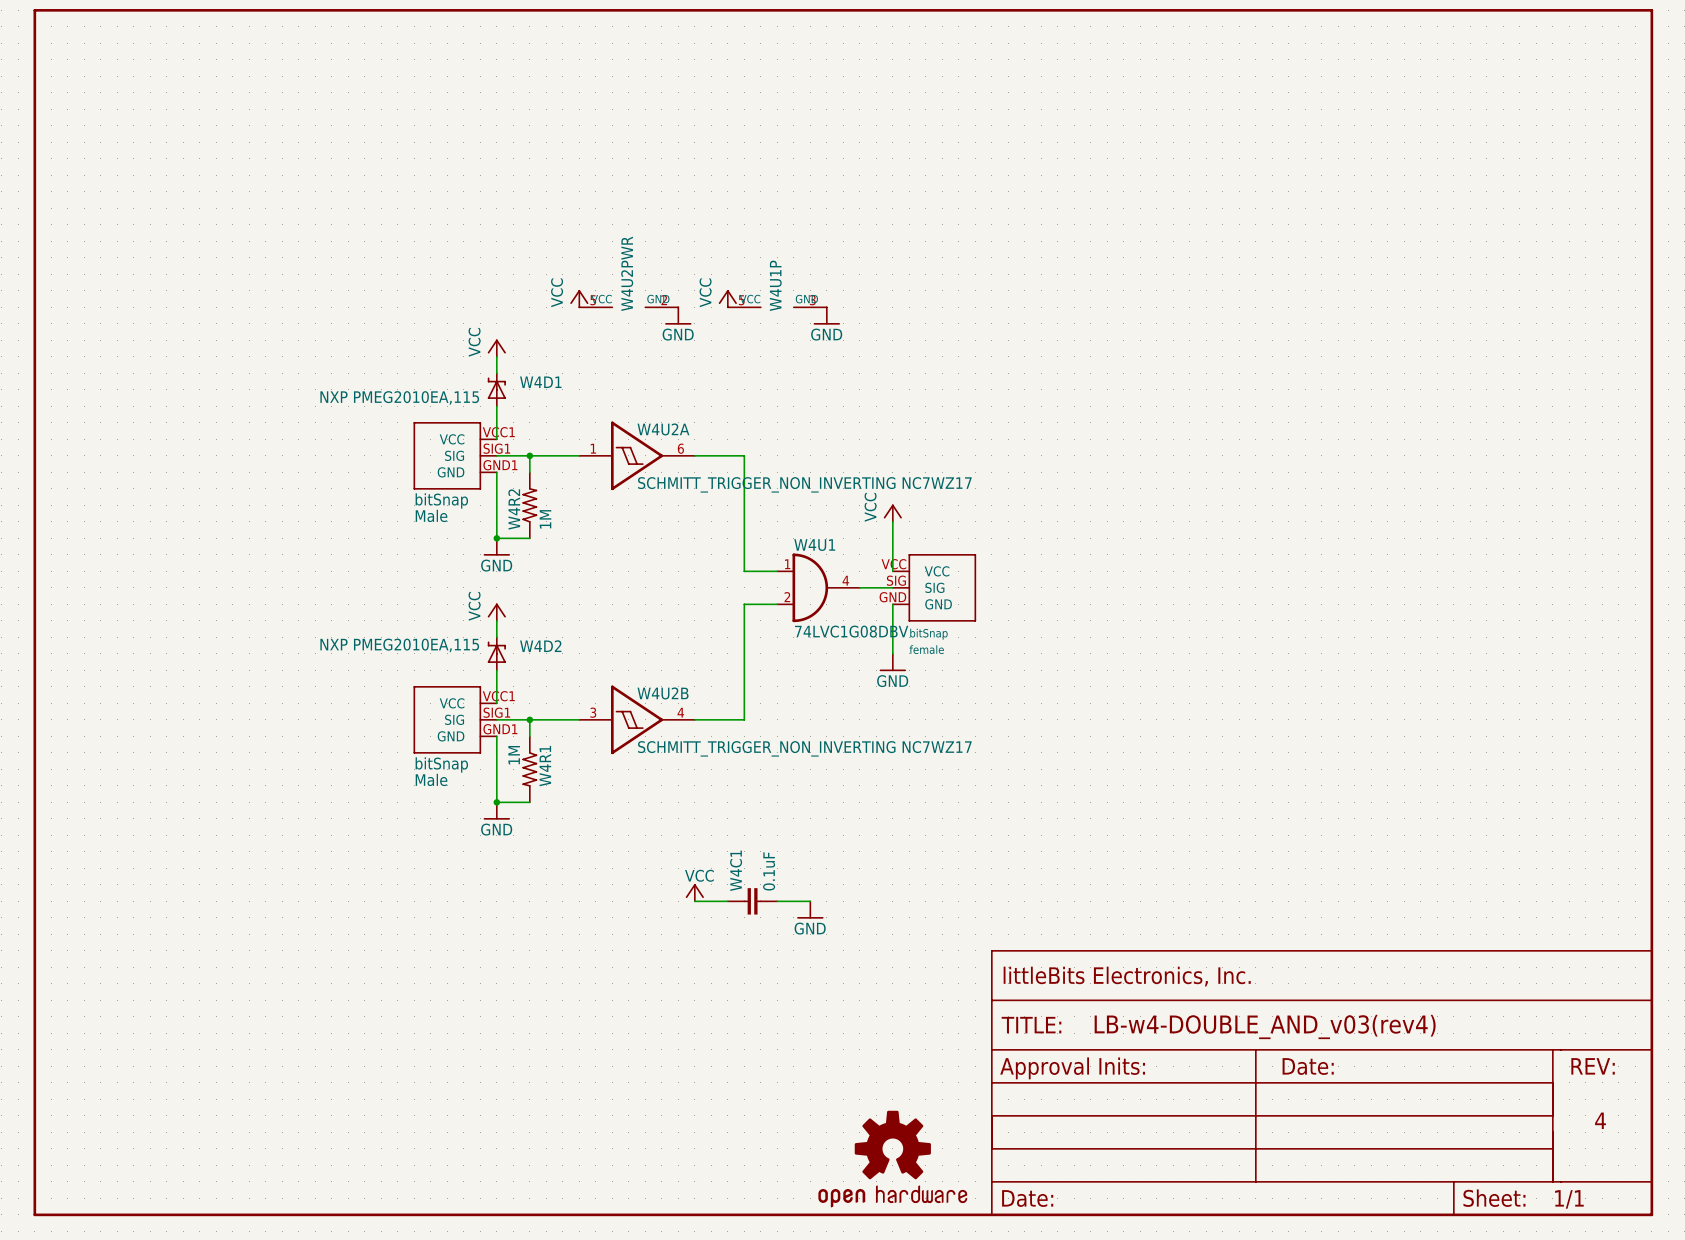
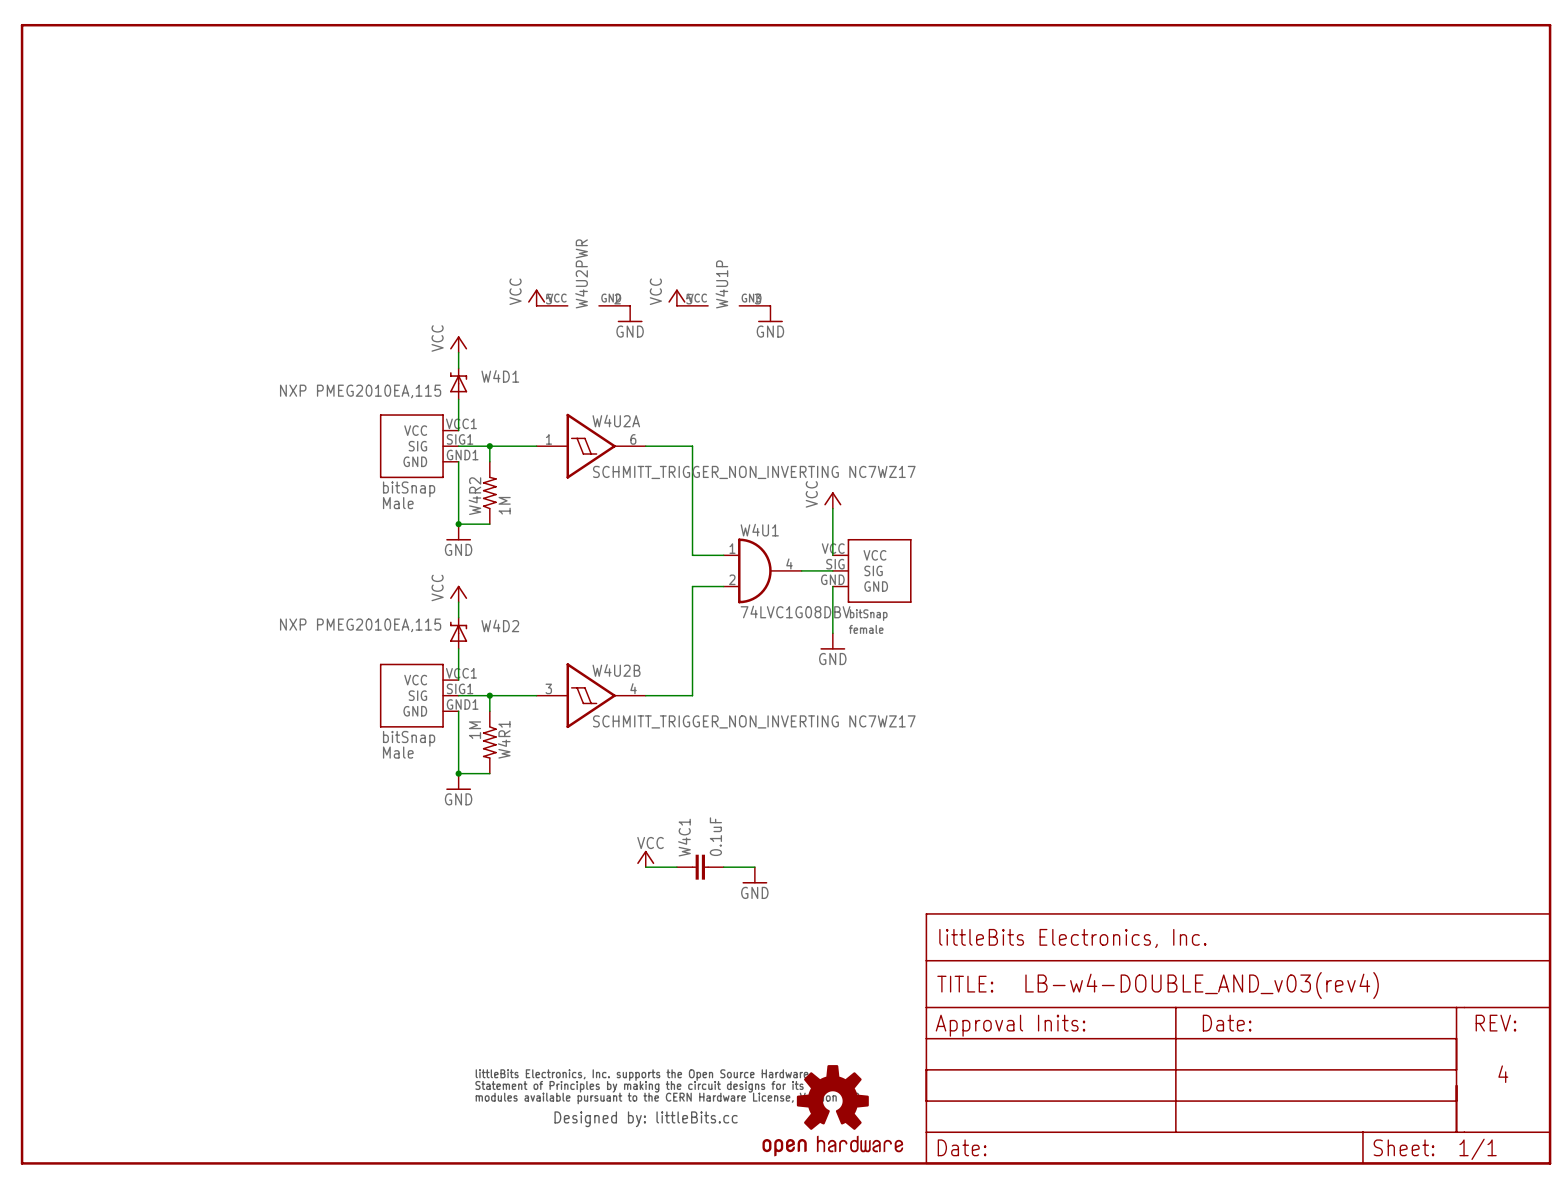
part: none -> (667, 1098)

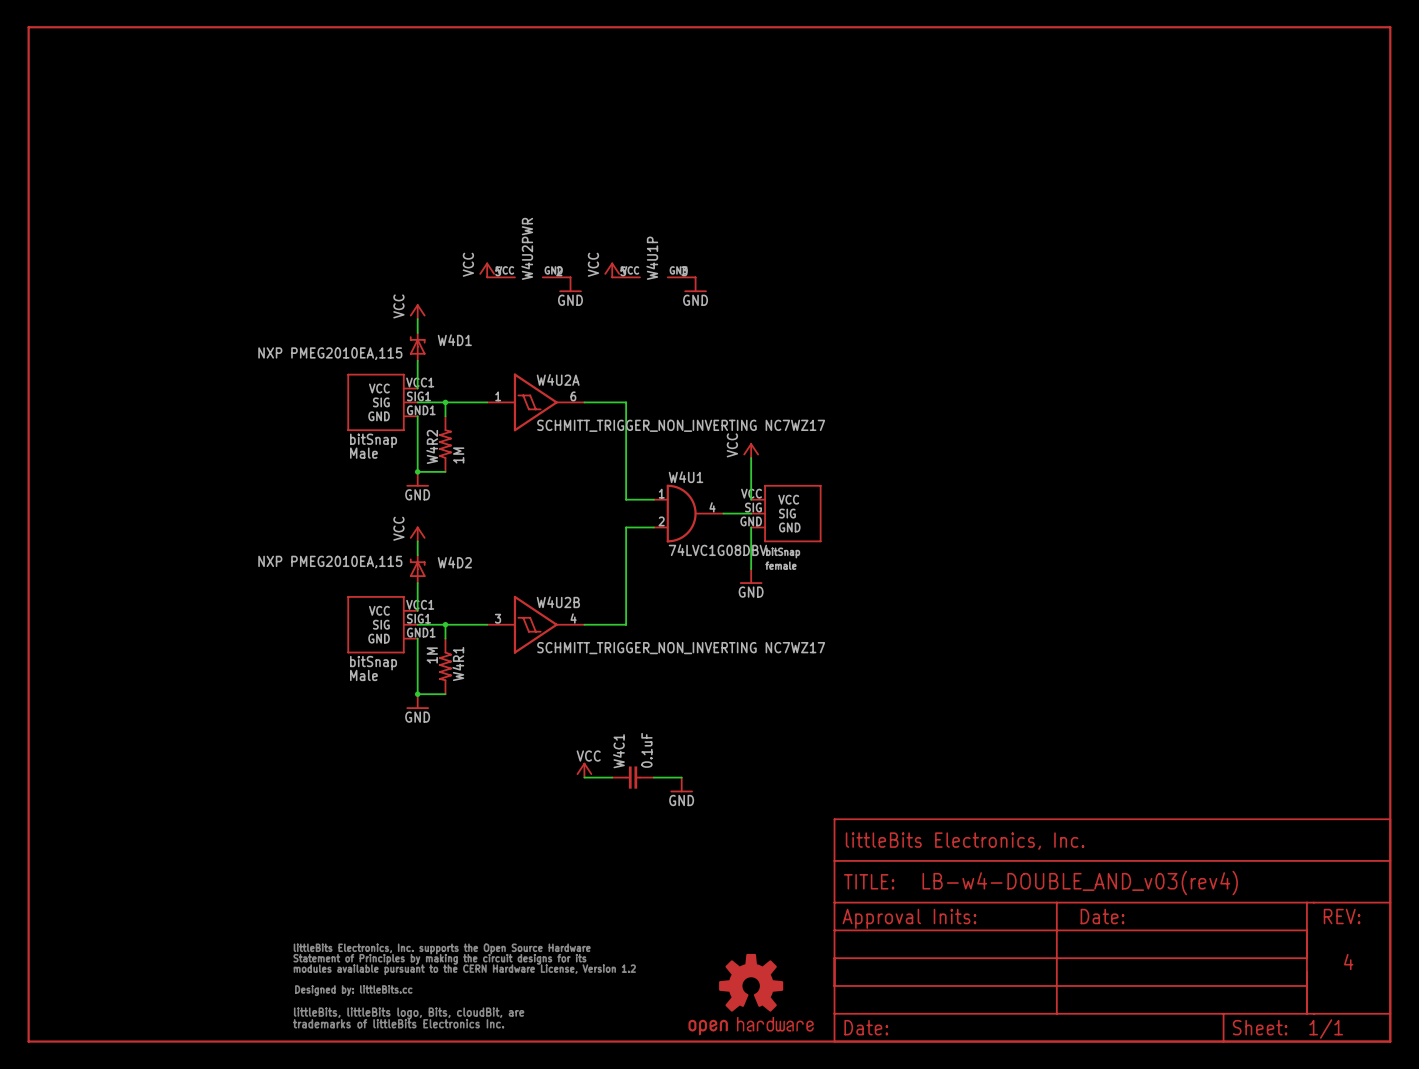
part: (667, 1098) -> none
part: none -> (464, 986)

